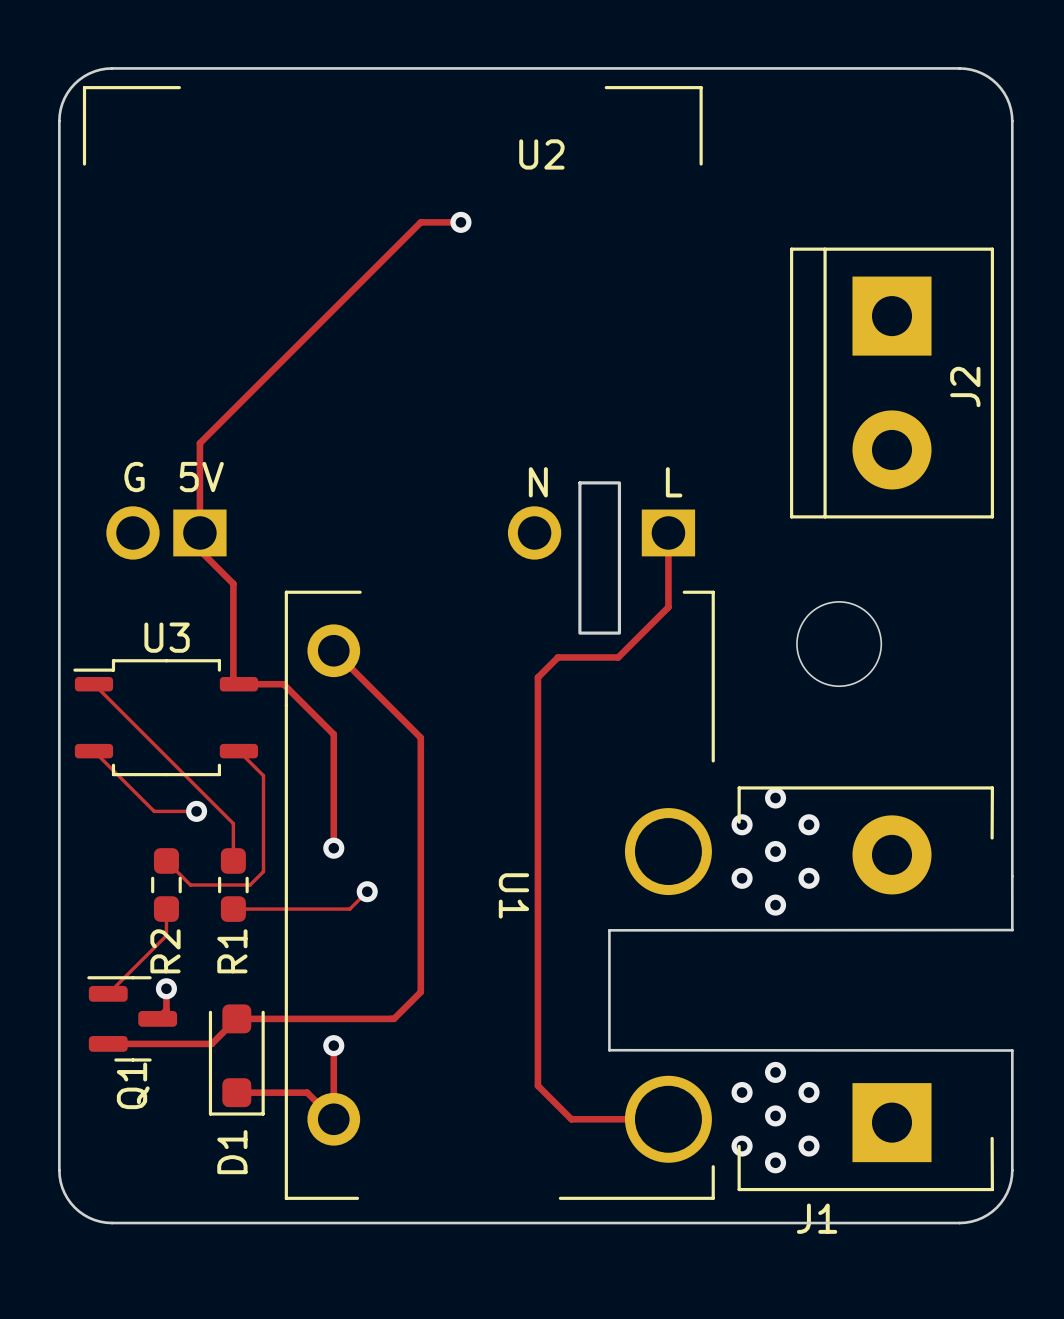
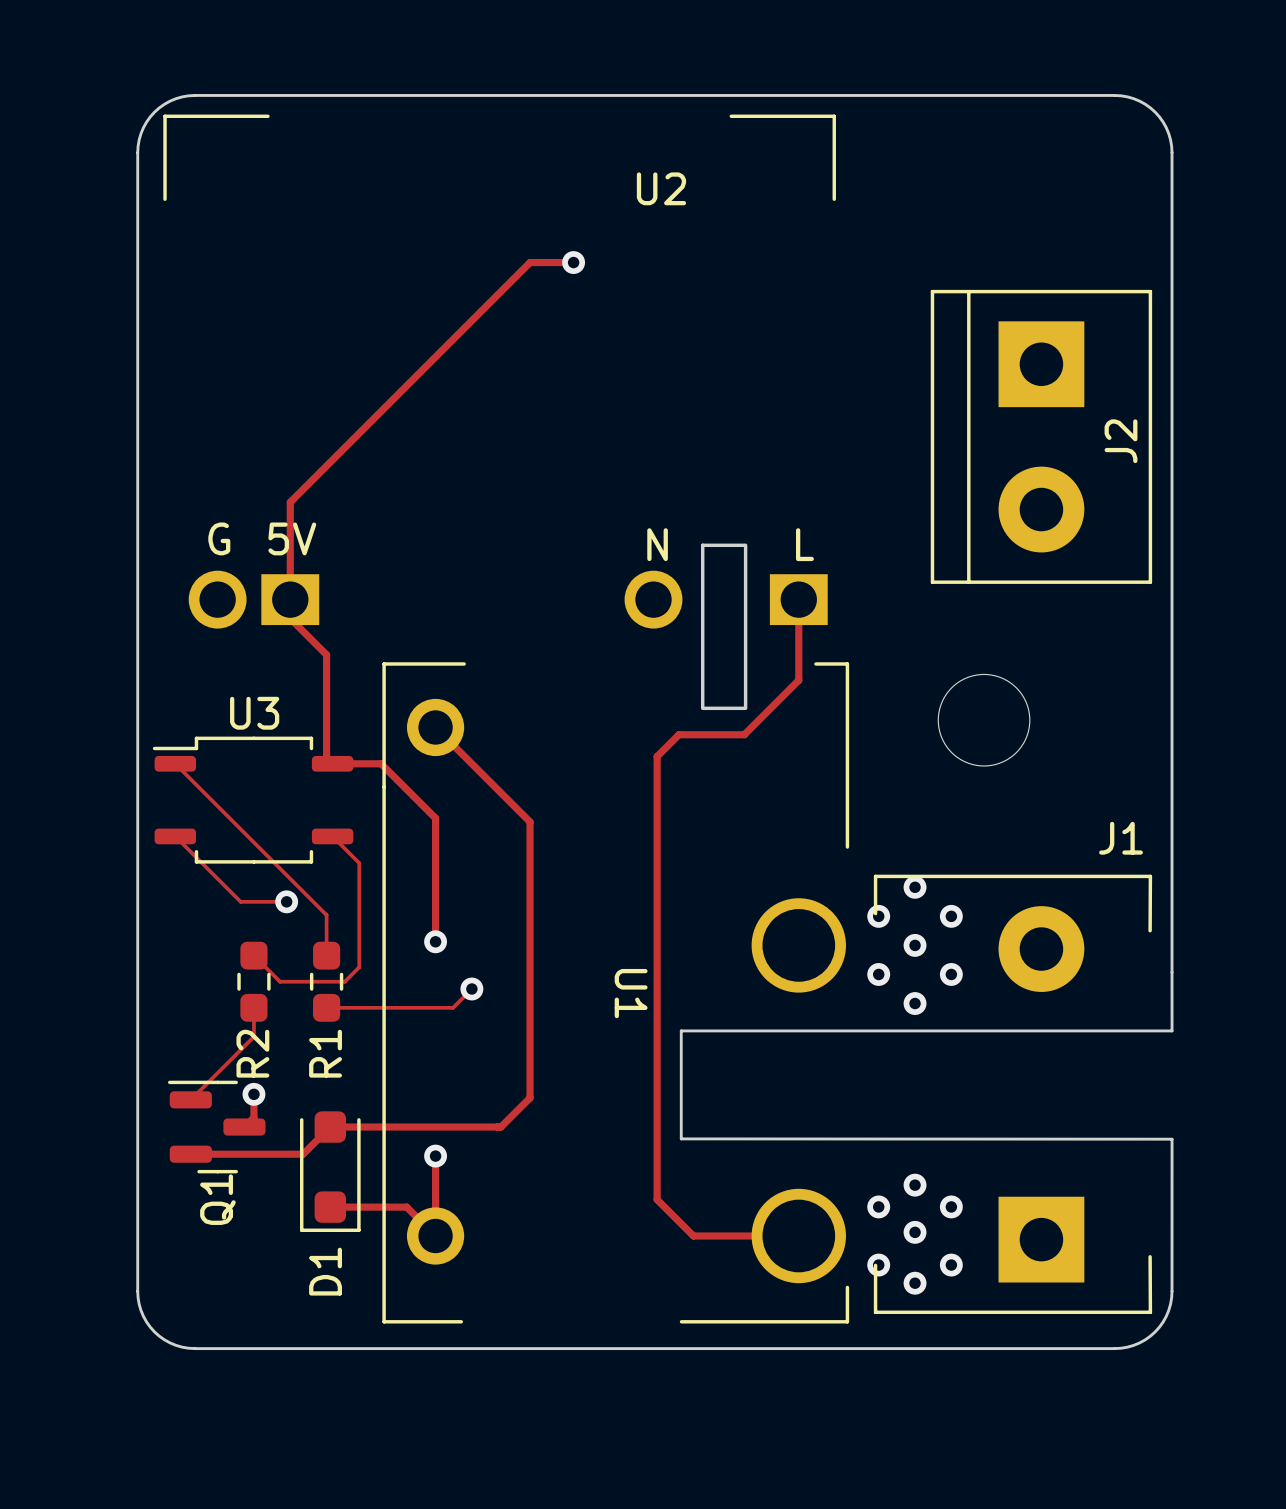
board edge: (1012, 930) (609, 930) (609, 1050) (1012, 1050) -> (1172, 1030) (681, 1030) (681, 1138) (1172, 1139) (1172, 1161)
J1 name position: J1 (817, 1218) -> J1 (1121, 838)

